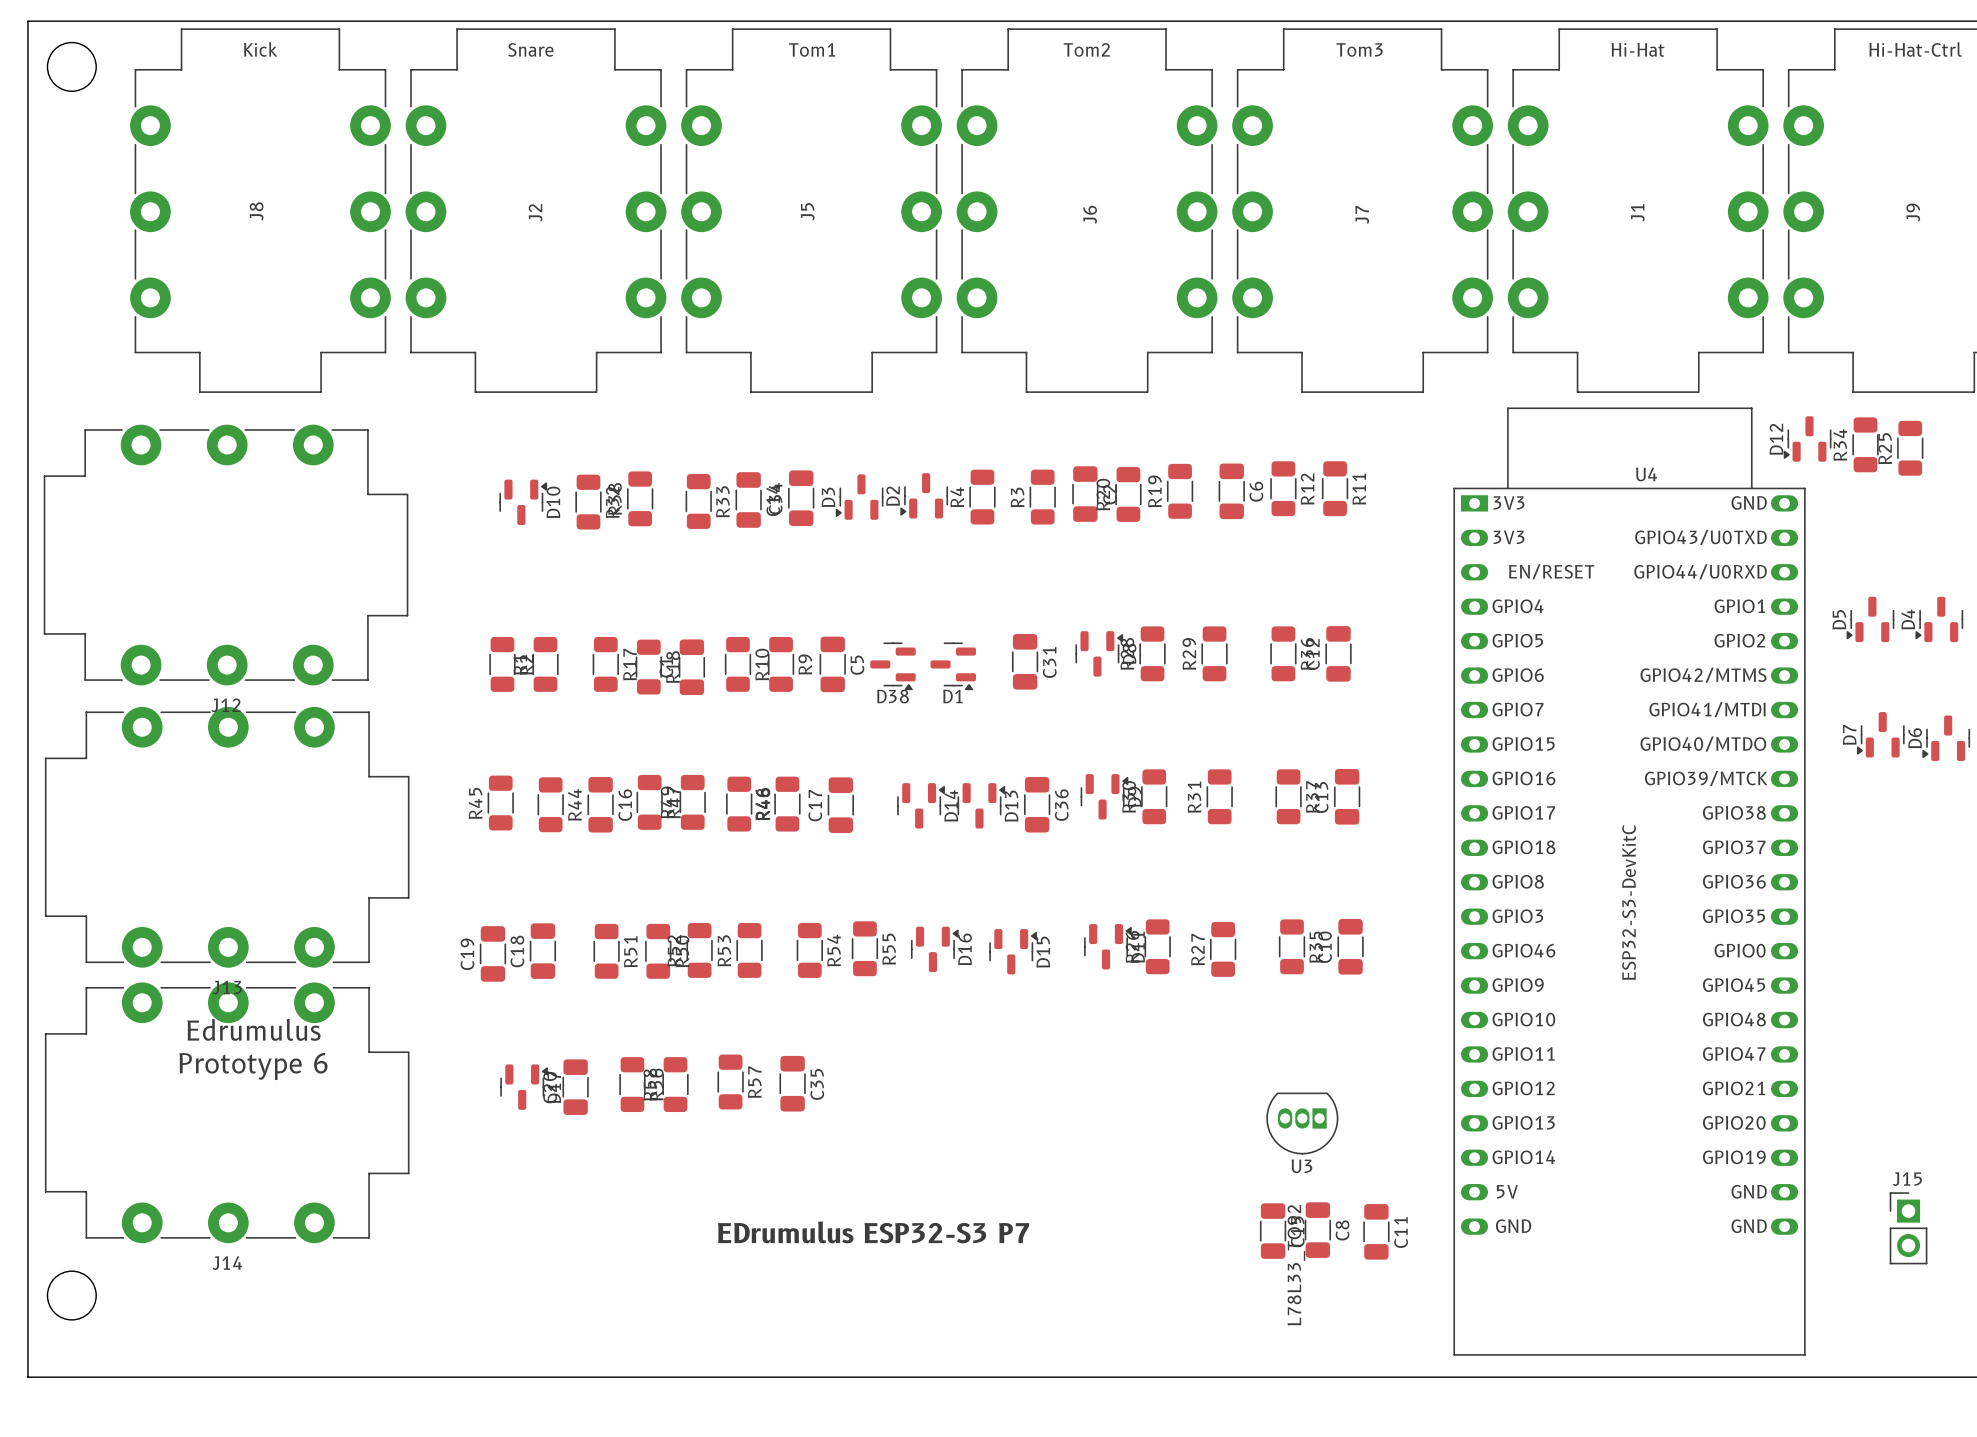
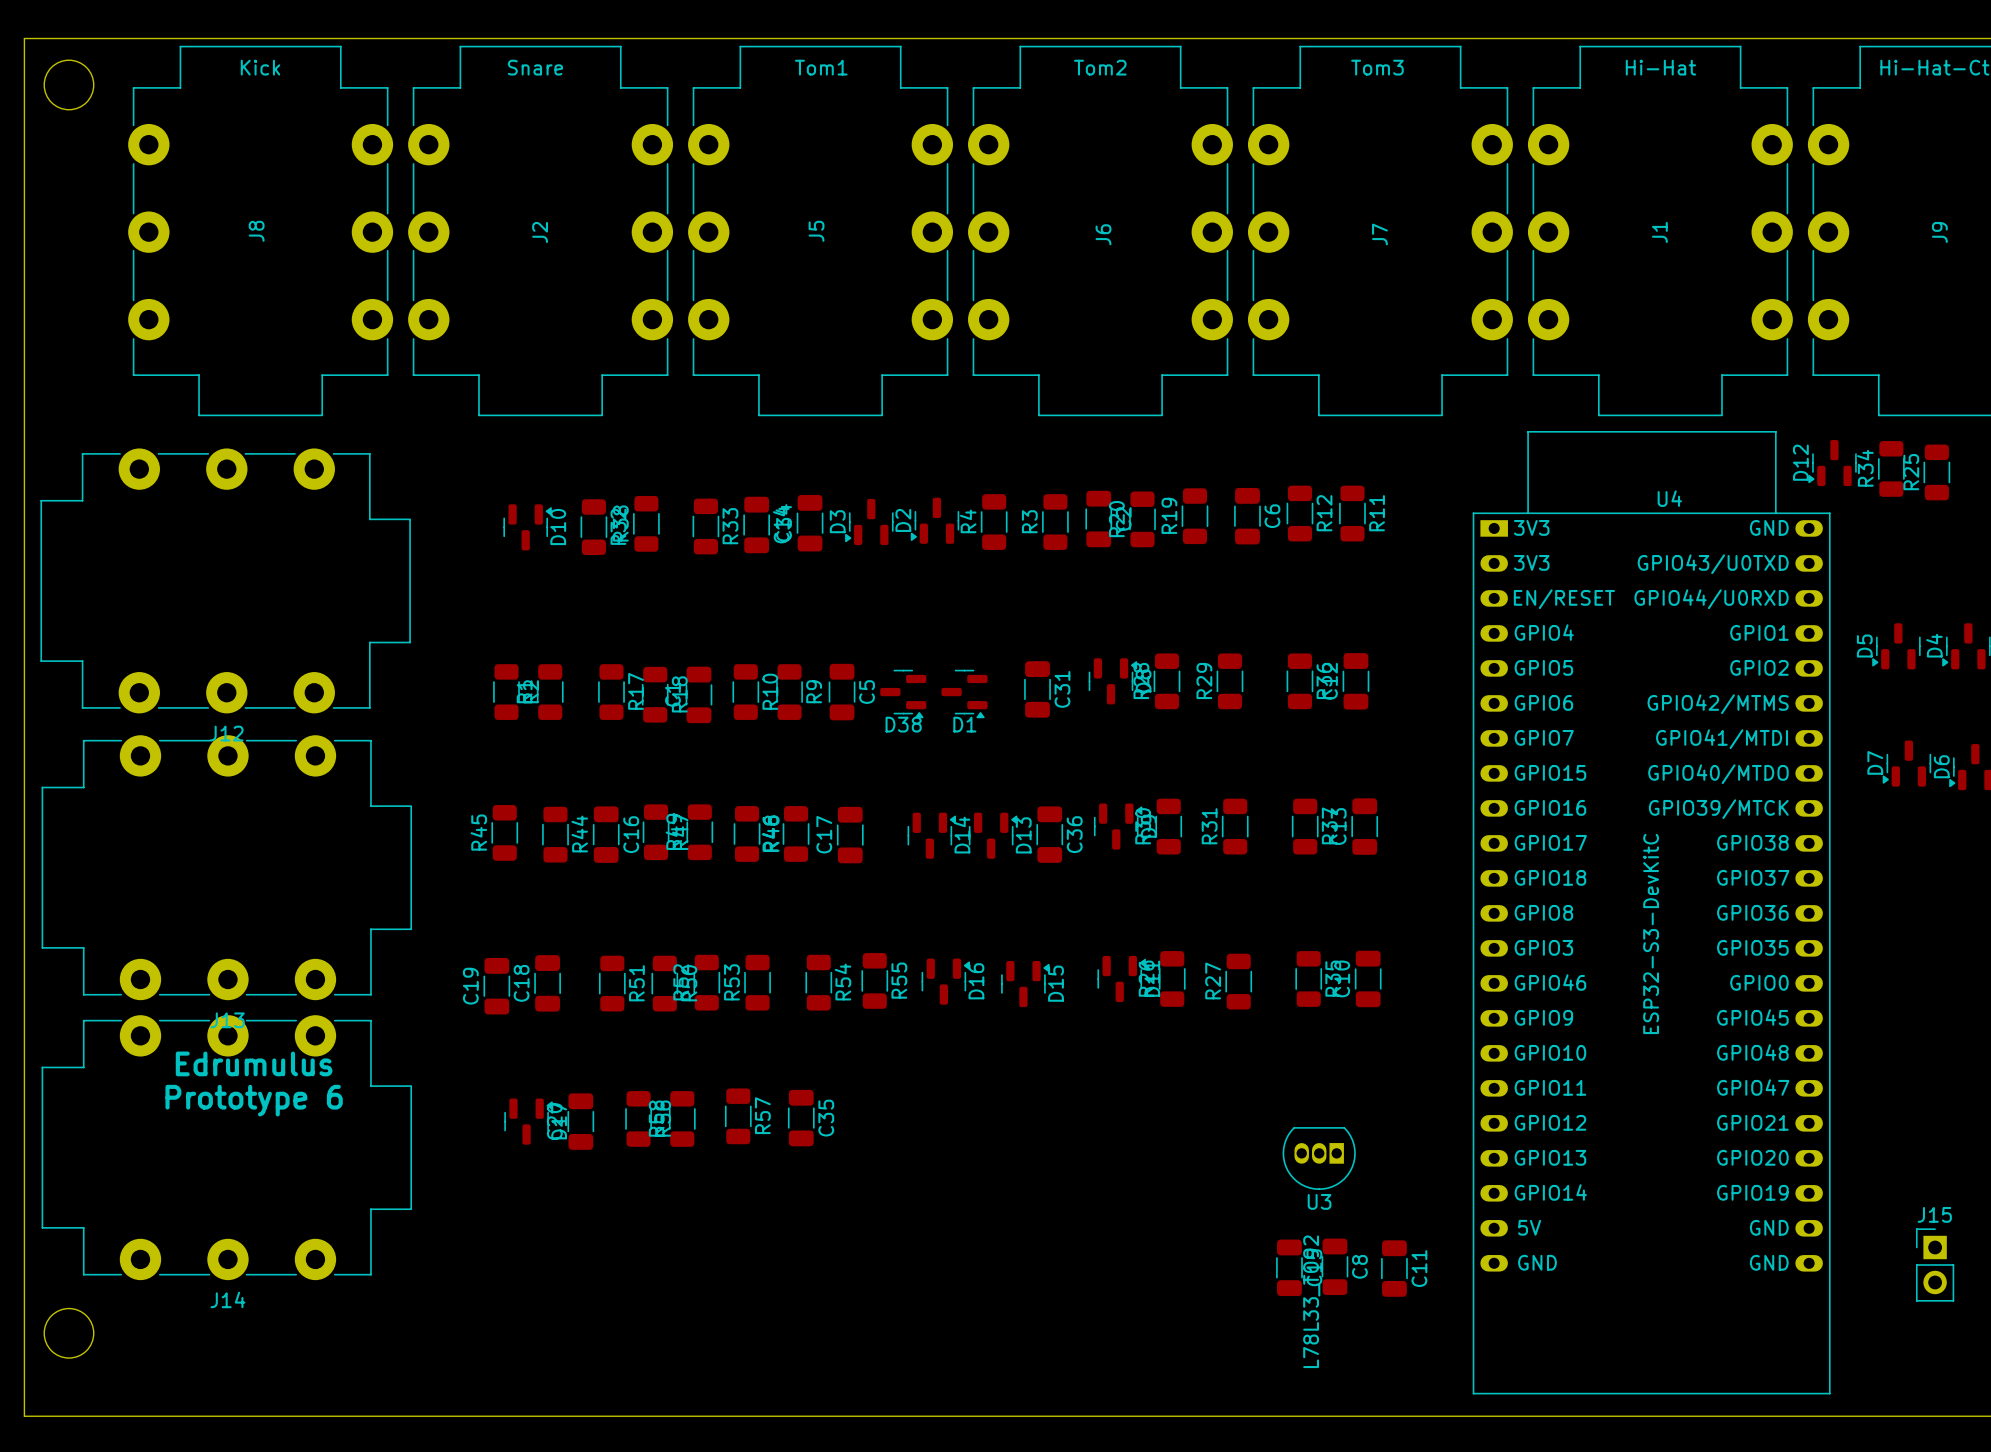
text: EDrumulus ESP32-S3 P7 (873, 1232) -> none

